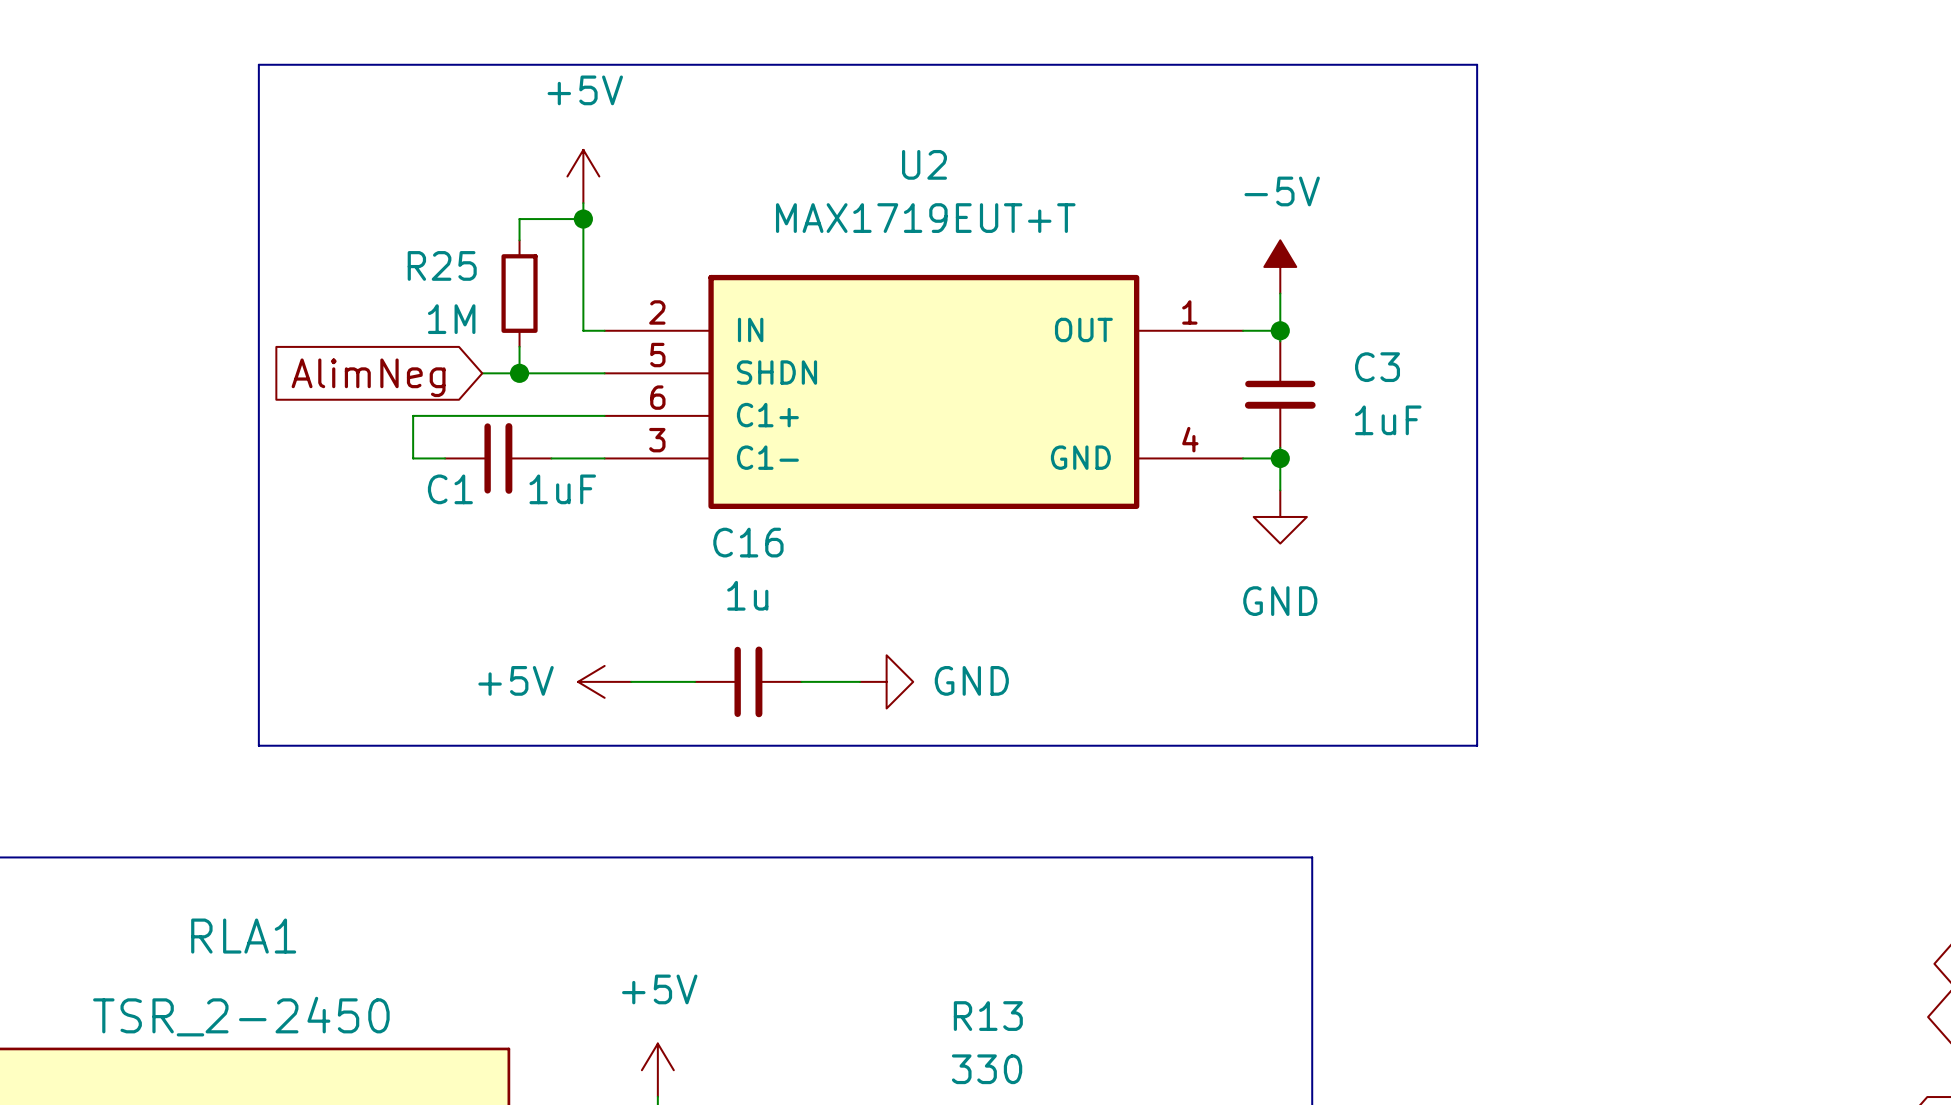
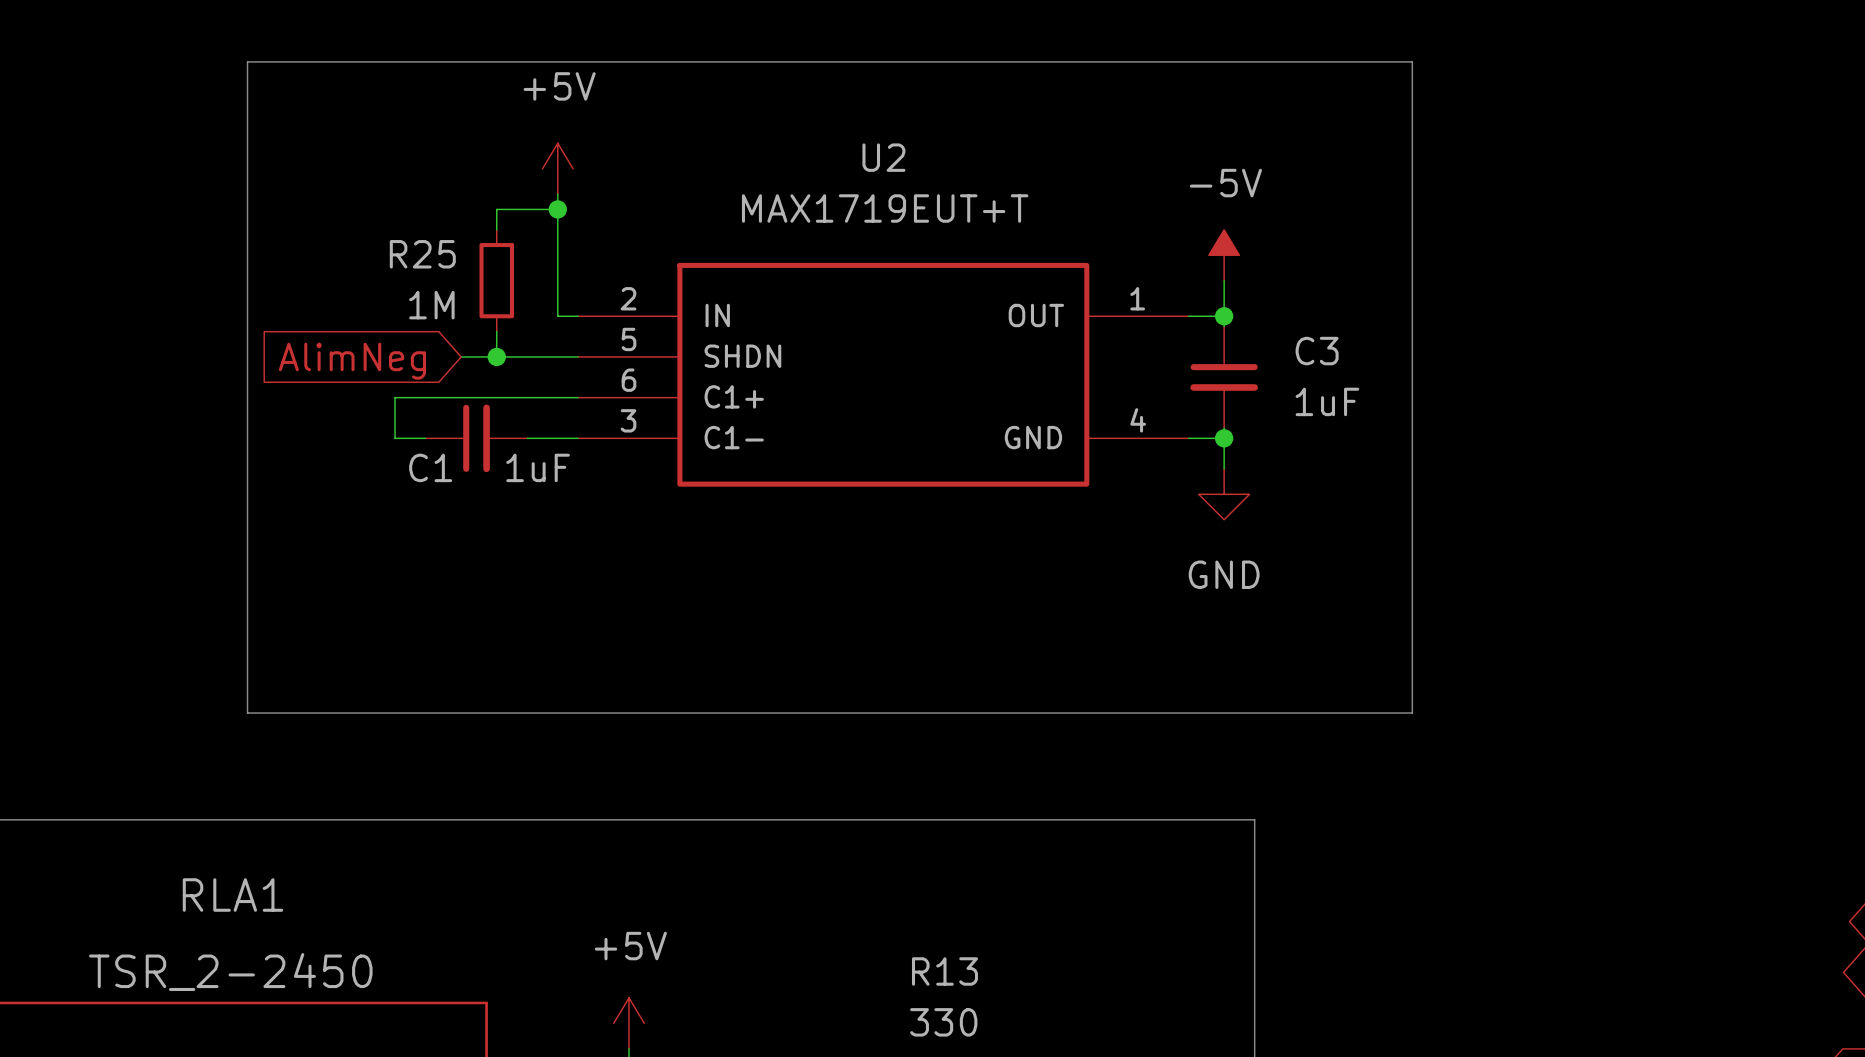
power symbol: +5V (604, 681) -> none
wire: (631, 681) (695, 681) -> none
C16: 1u (748, 681) -> none
wire: (801, 681) (860, 681) -> none
power symbol: GND (886, 681) -> none

